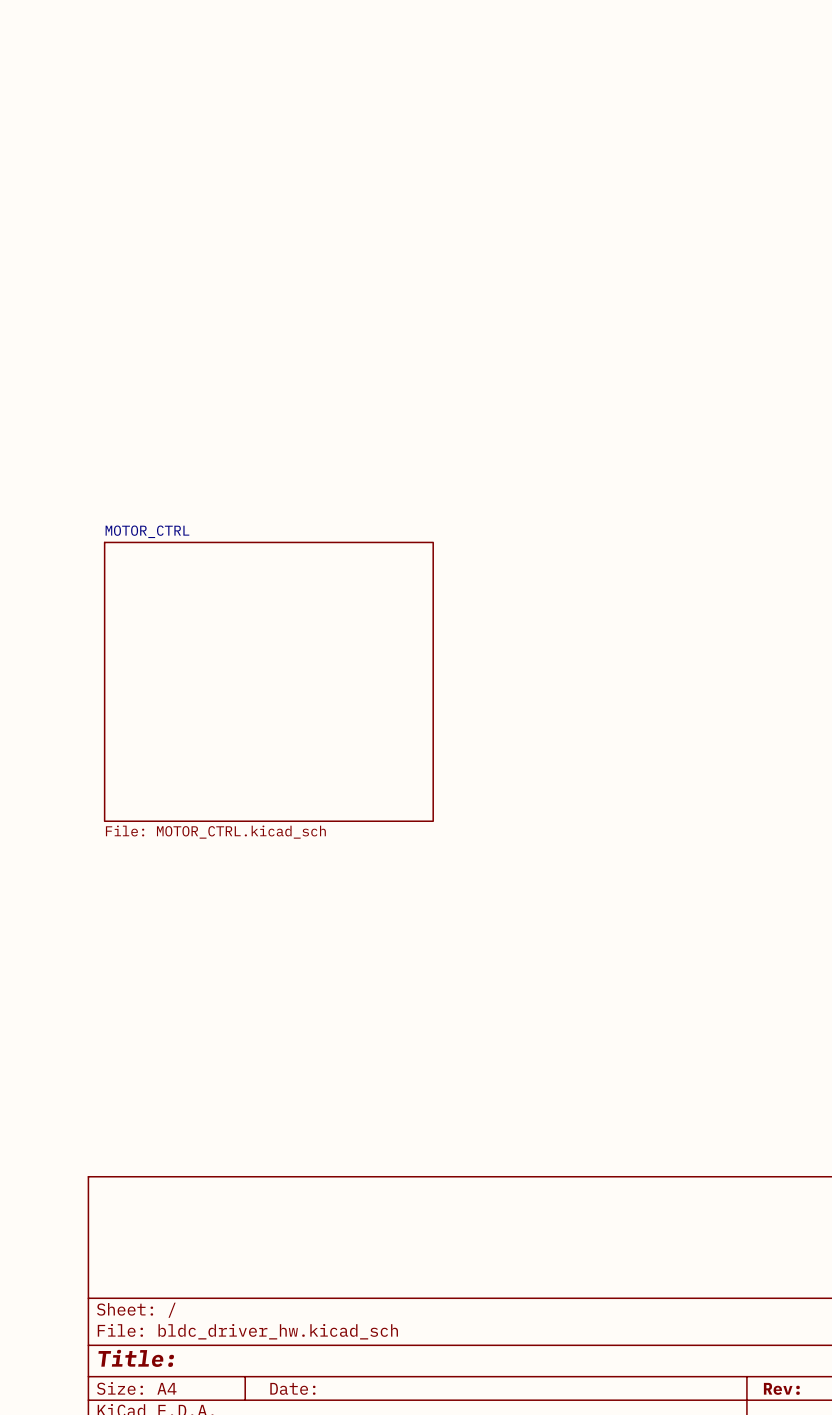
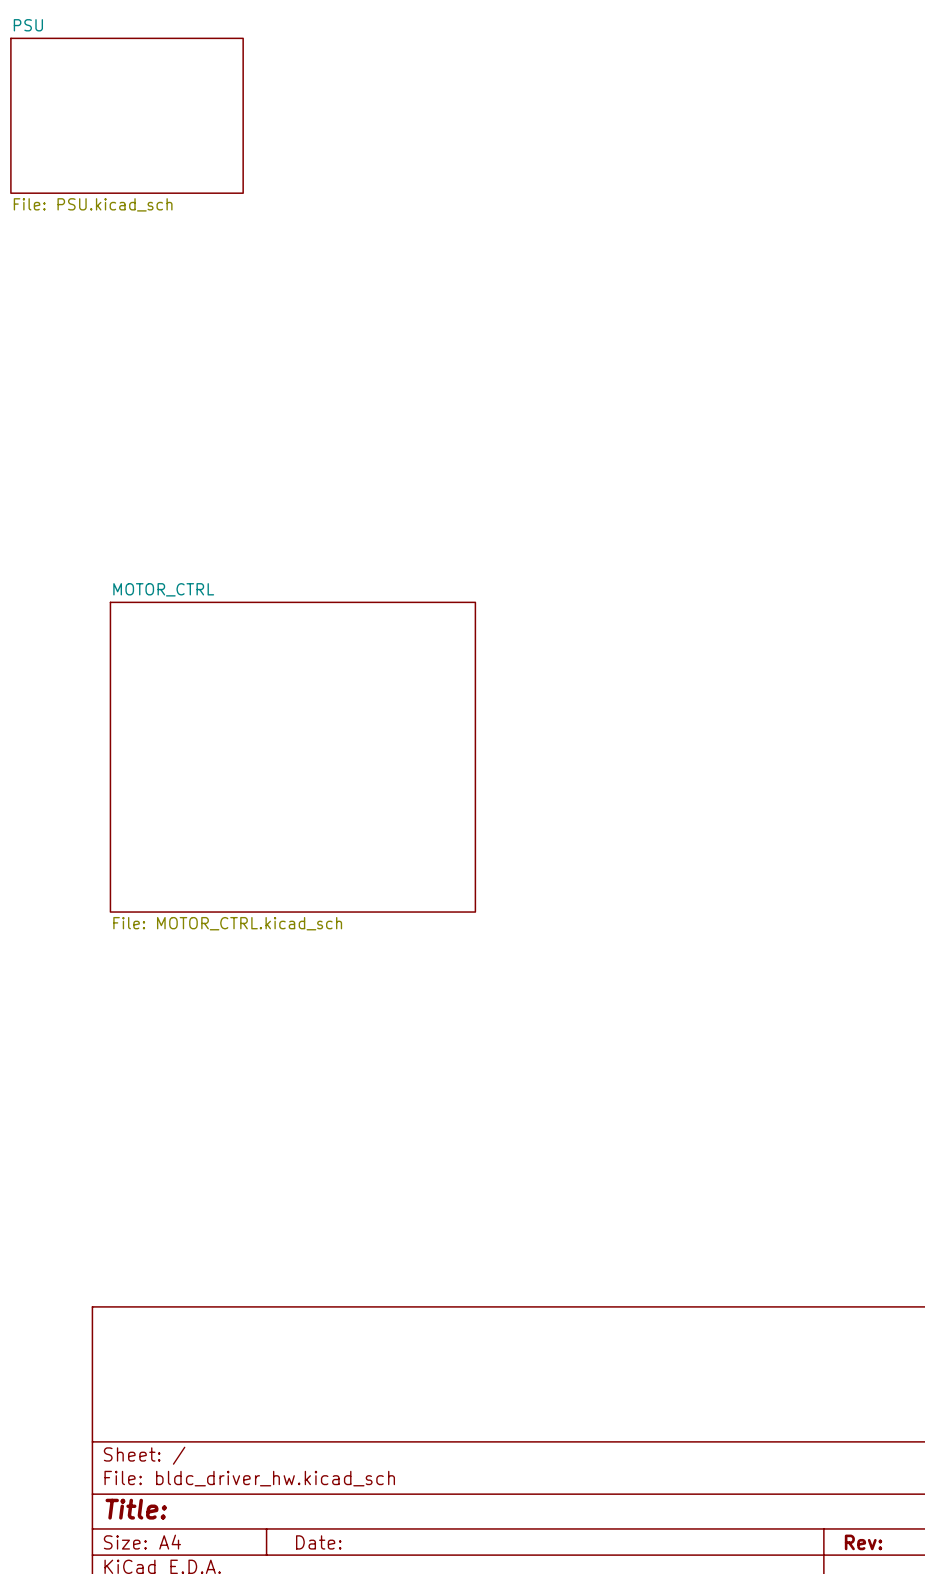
sheet PSU: none -> File: PSU.kicad_sch (127, 115)

